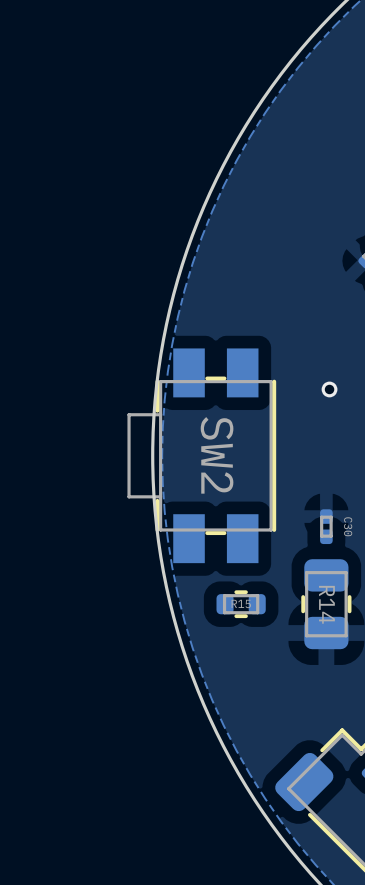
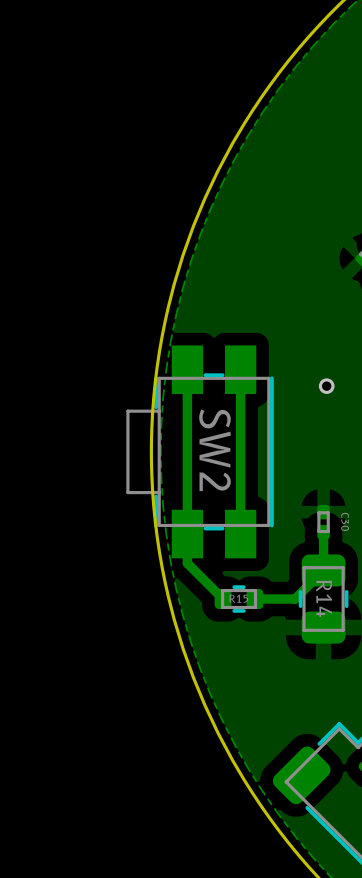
track: none -> (187, 369) (187, 563) (223, 599)
track: none -> (240, 369) (240, 534)
track: none -> (323, 532) (323, 570) (295, 599) (255, 599)

